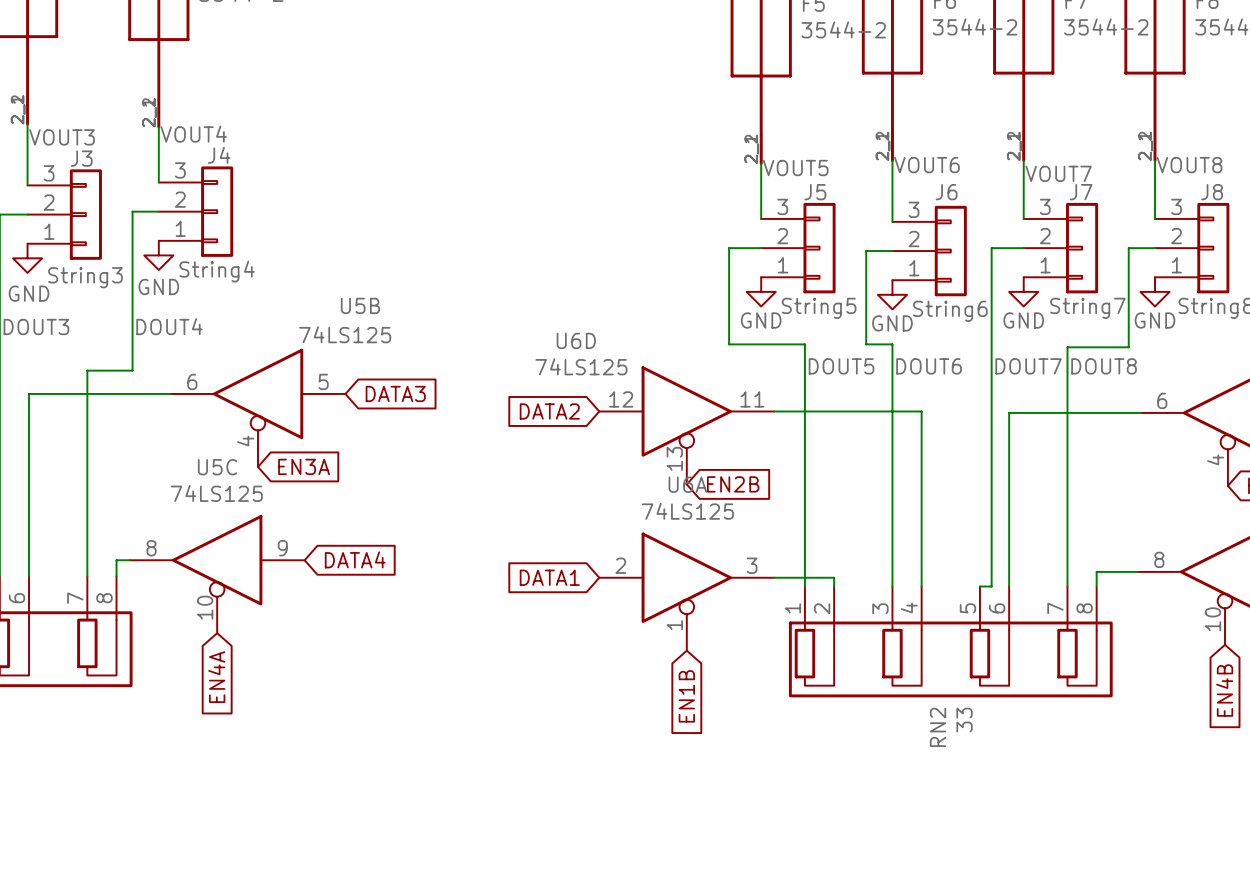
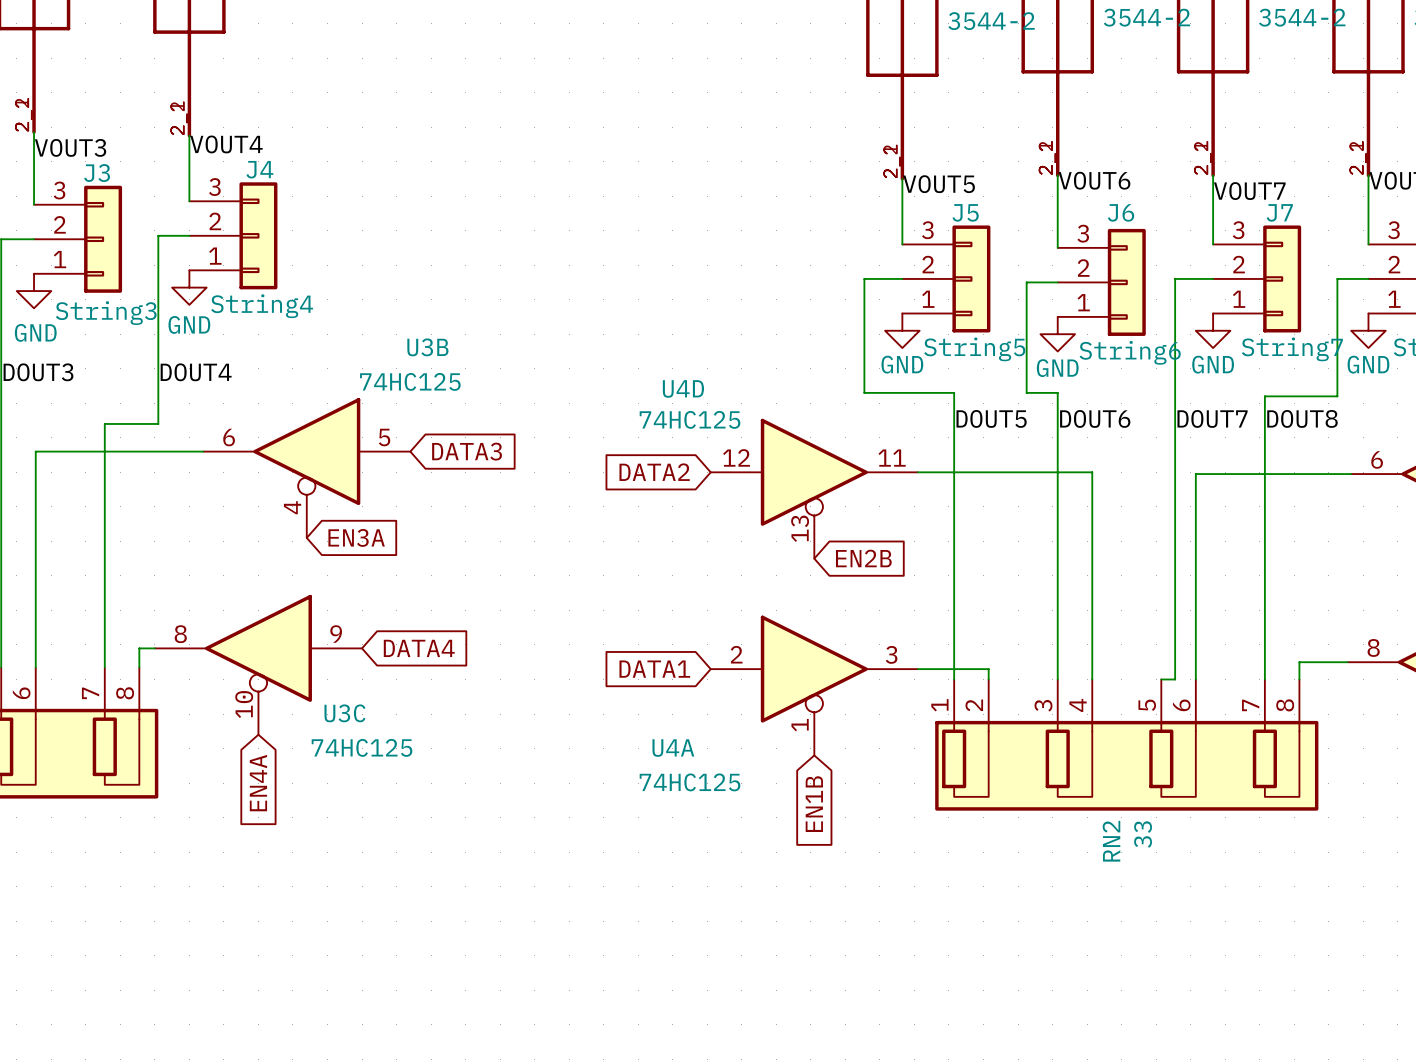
U5B name: U5B (360, 305) -> U3B (427, 347)
U5B value: 74LS125 (345, 334) -> 74HC125 (410, 381)
U6D name: U6D (576, 340) -> U4D (683, 388)
U6D value: 74LS125 (581, 366) -> 74HC125 (690, 419)
U5C name: U5C (217, 467) -> U3C (344, 713)
U6A name: U6A (687, 484) -> U4A (673, 748)
U5C value: 74LS125 (216, 493) -> 74HC125 (362, 747)
U6A value: 74LS125 (687, 511) -> 74HC125 (690, 782)

